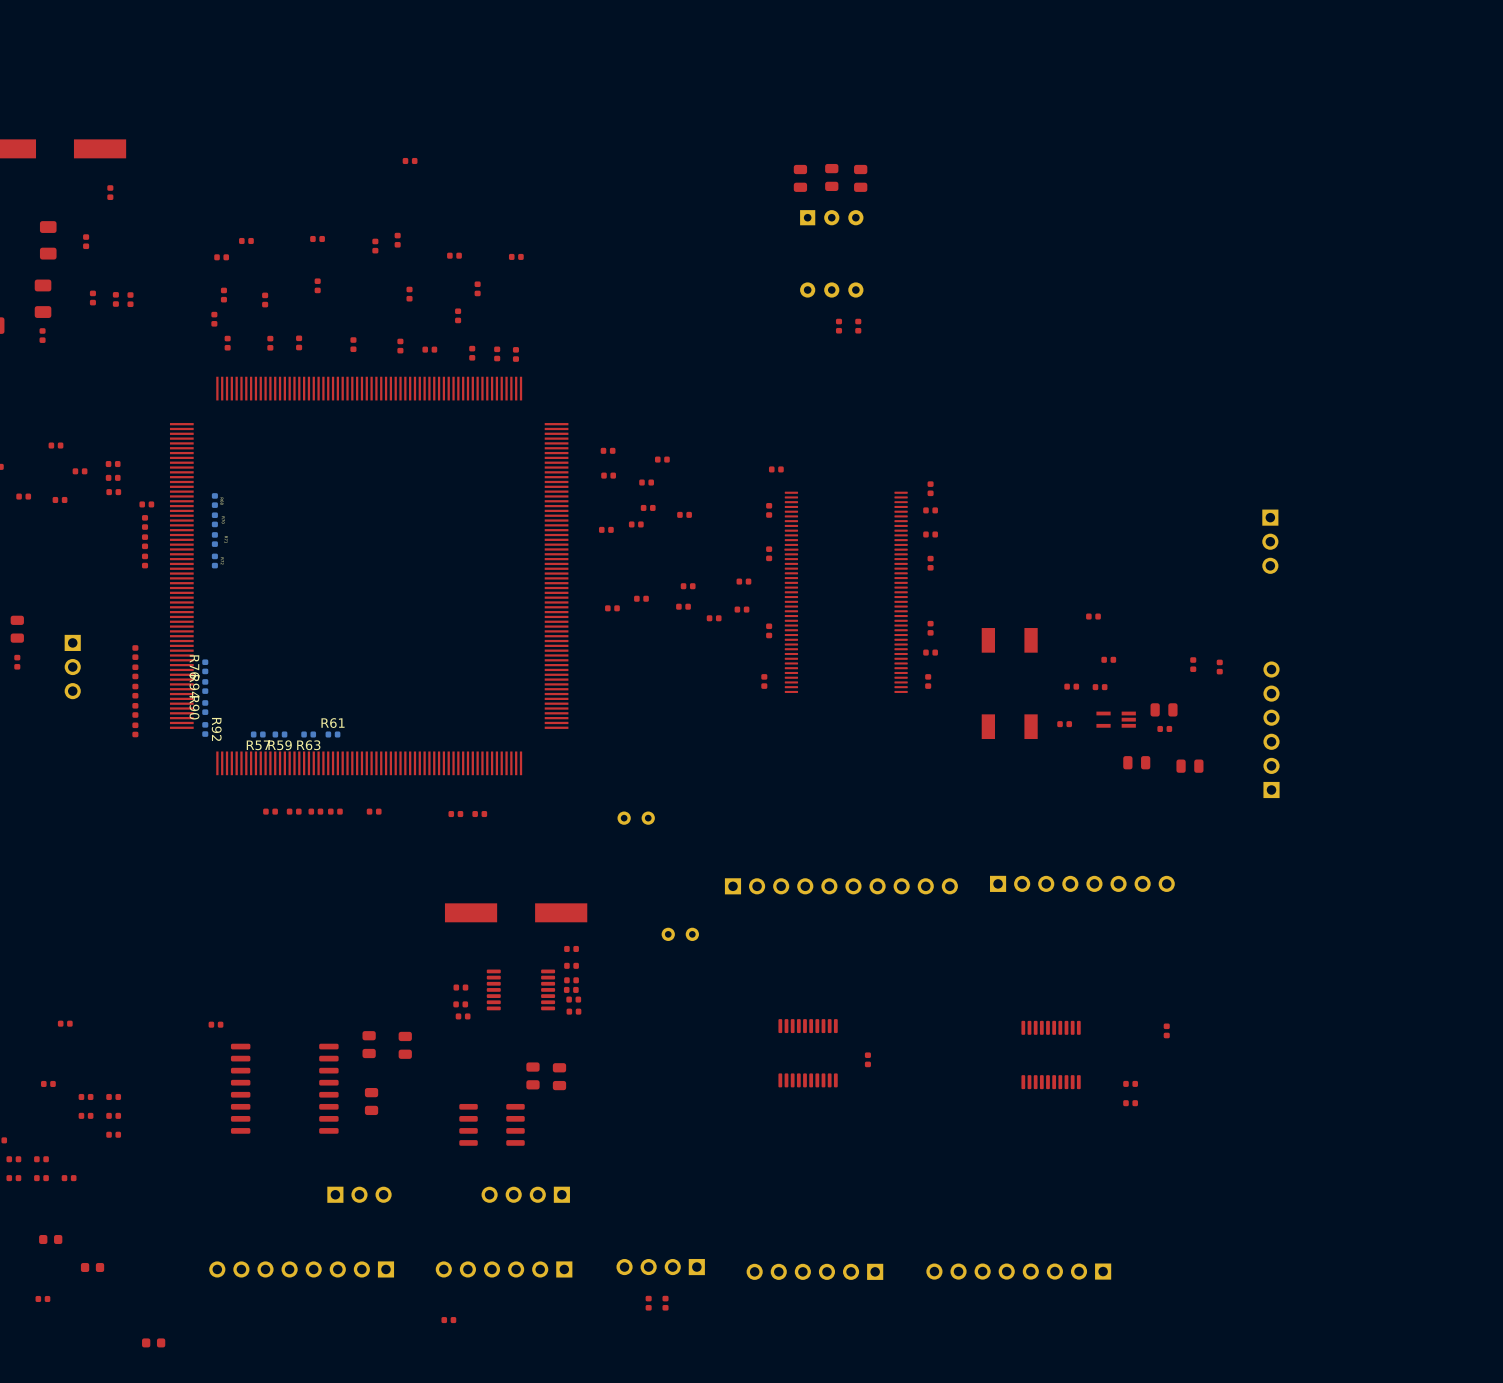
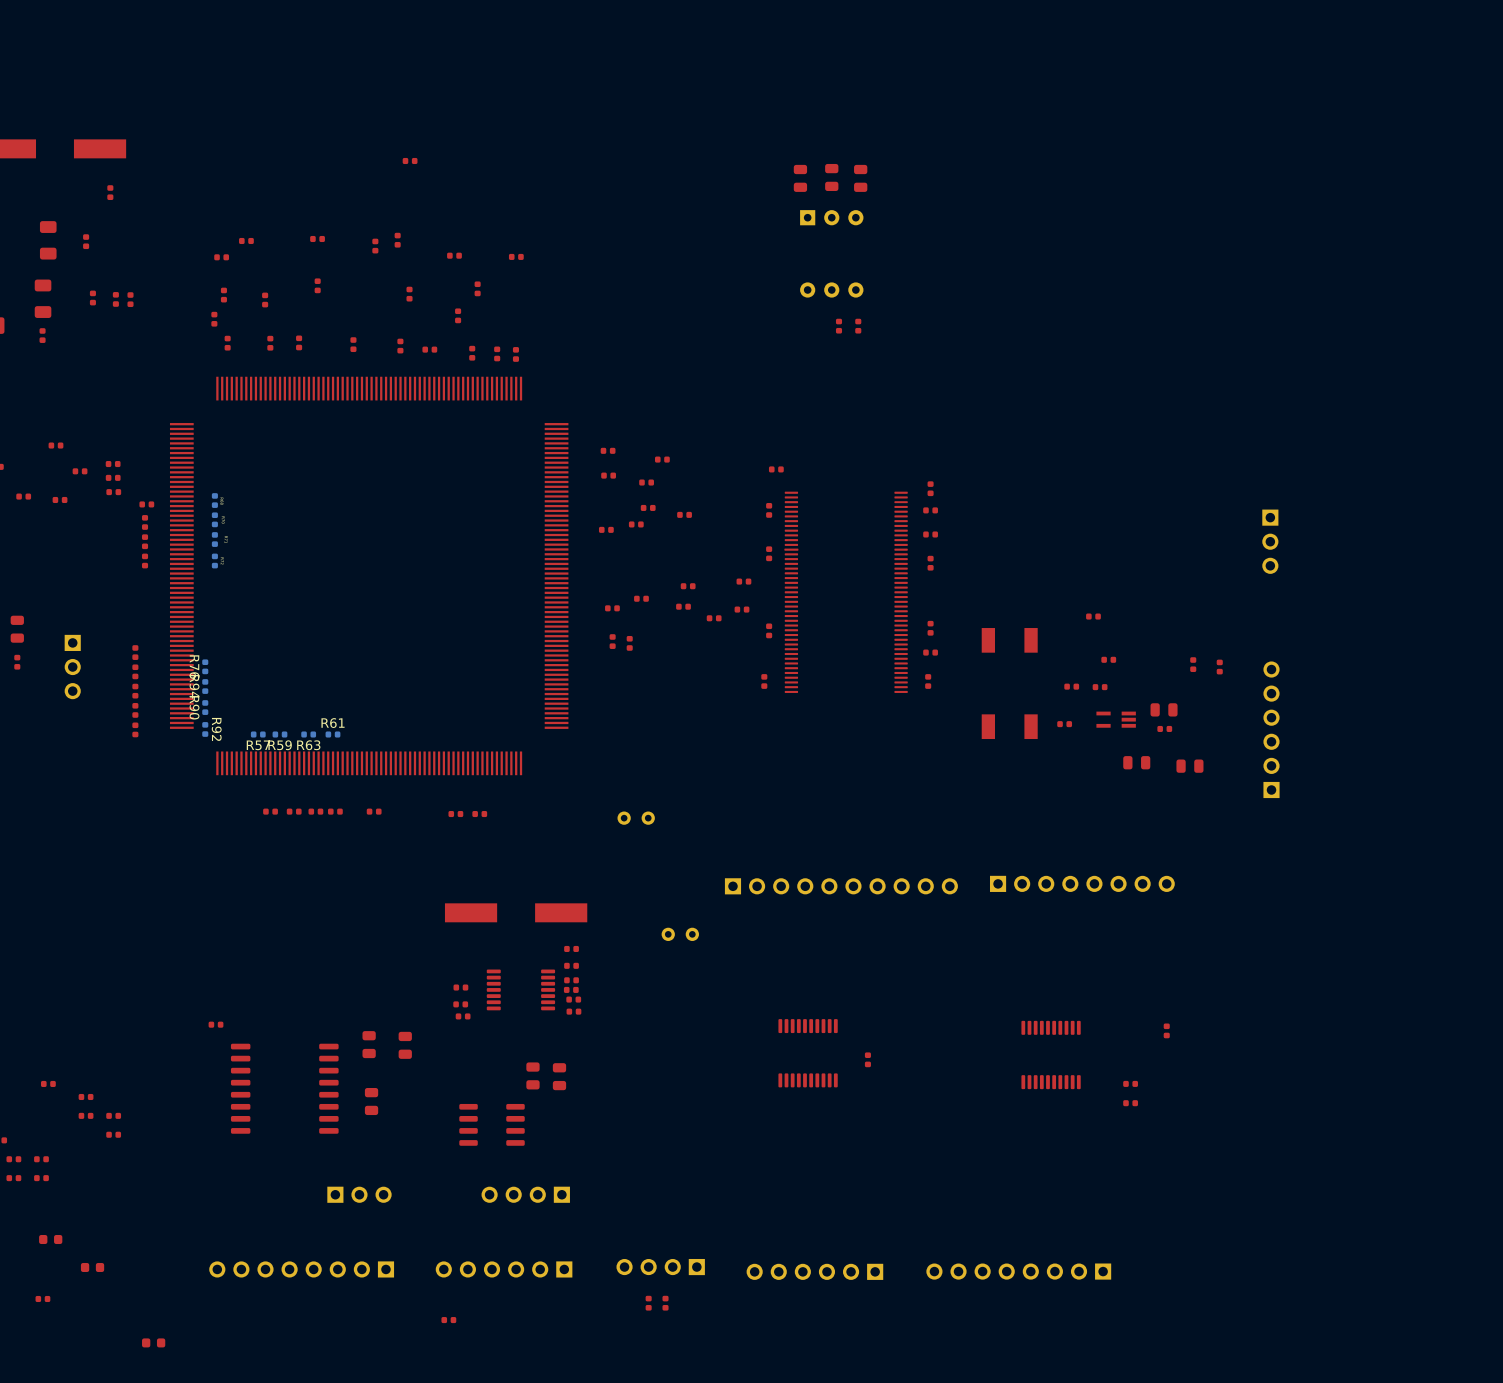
part: none -> (612, 641)
part: none -> (629, 643)
part: (65, 1023) -> none
part: (113, 1096) -> none
part: (69, 1178) -> none

